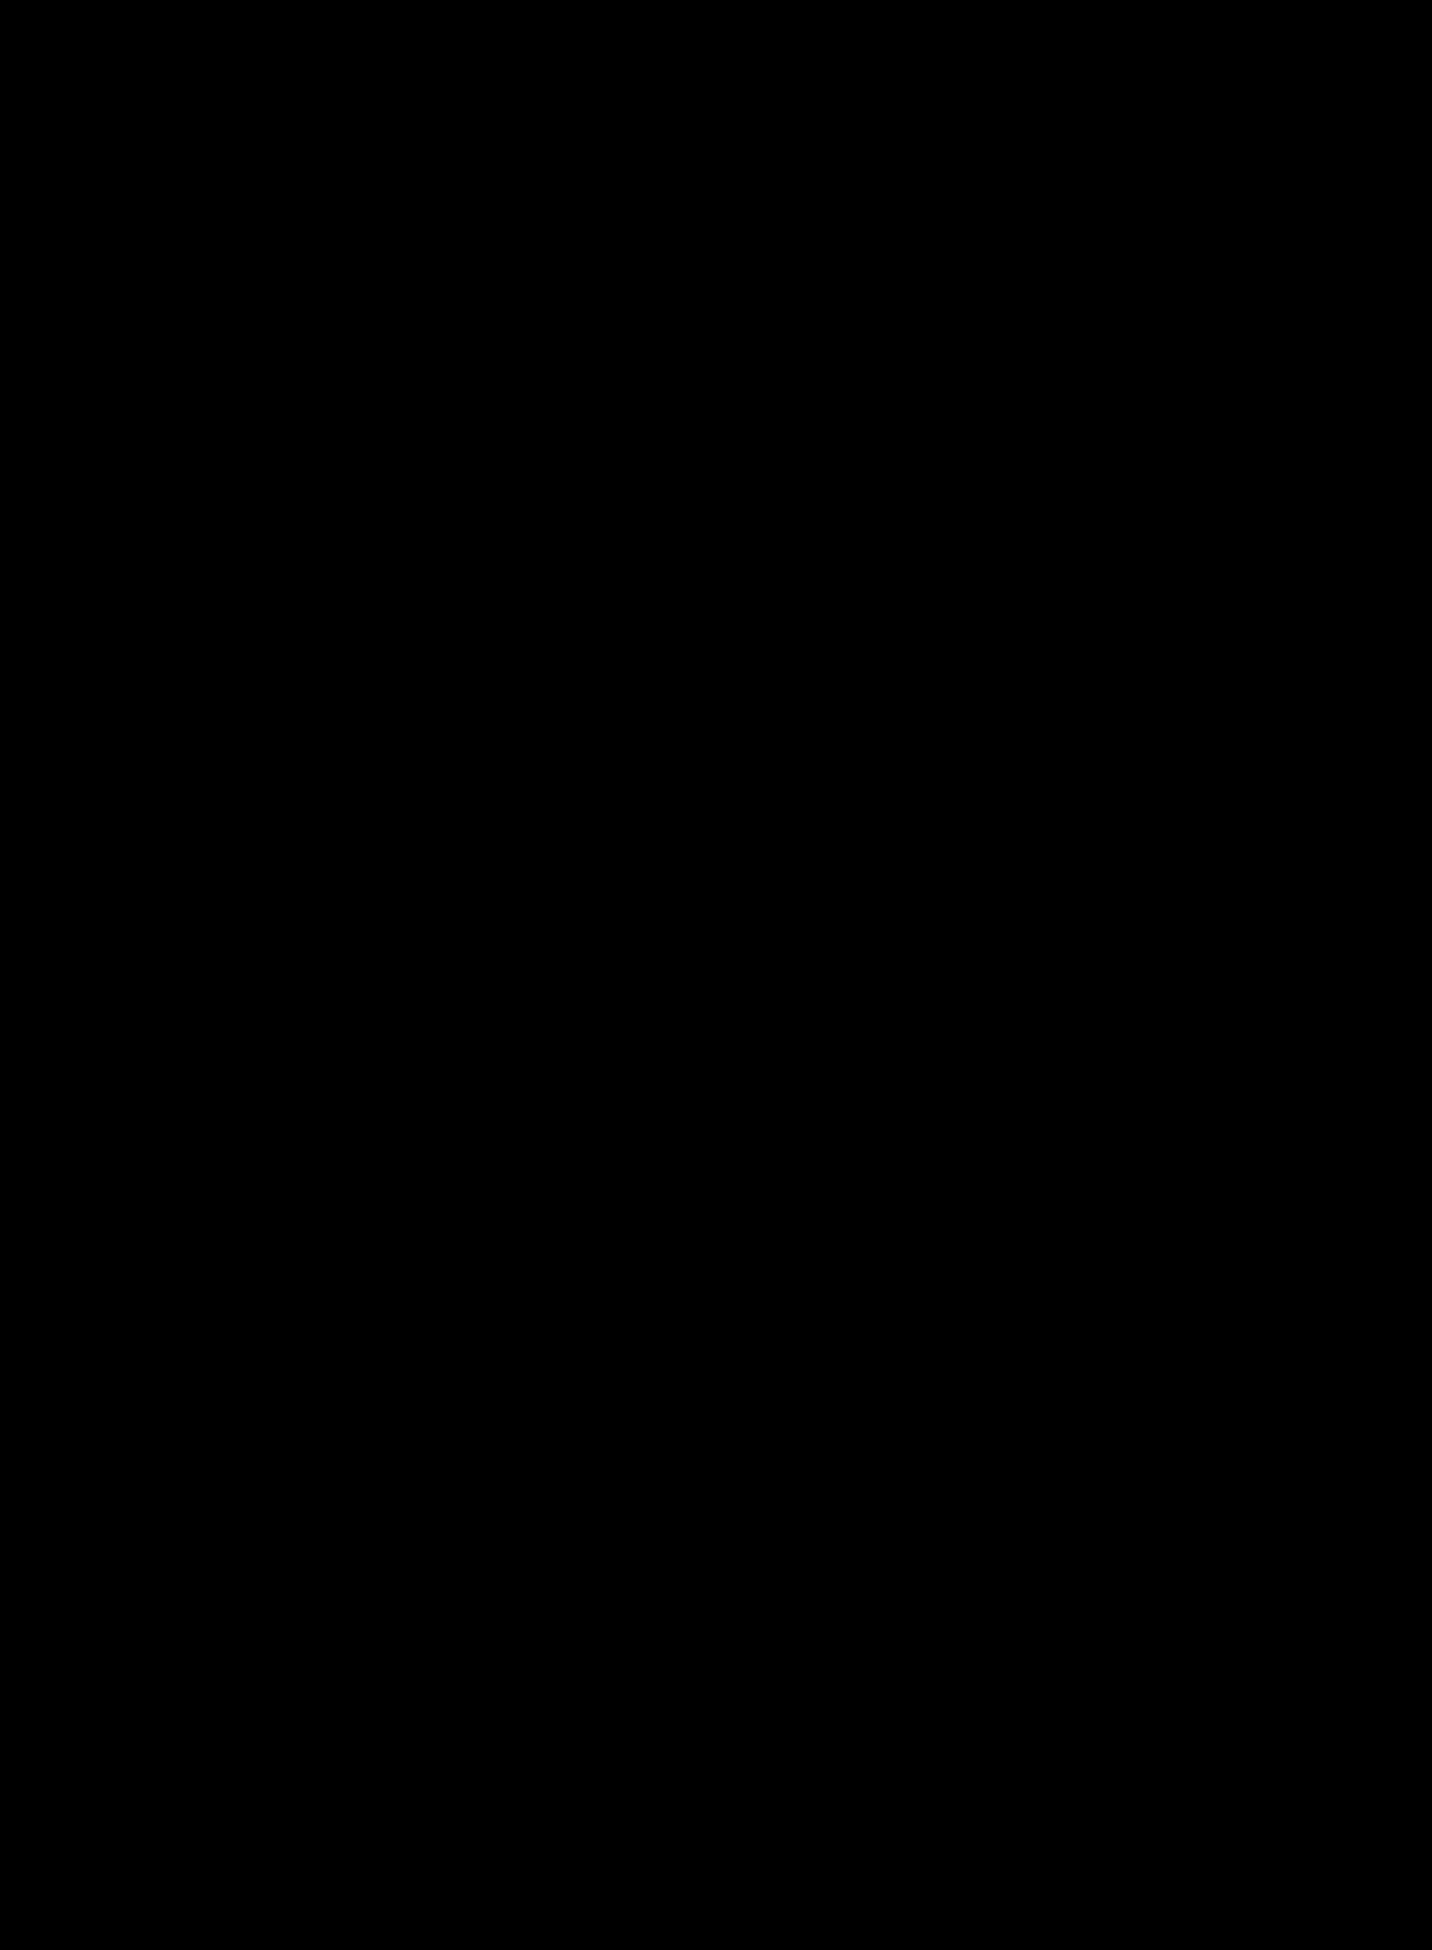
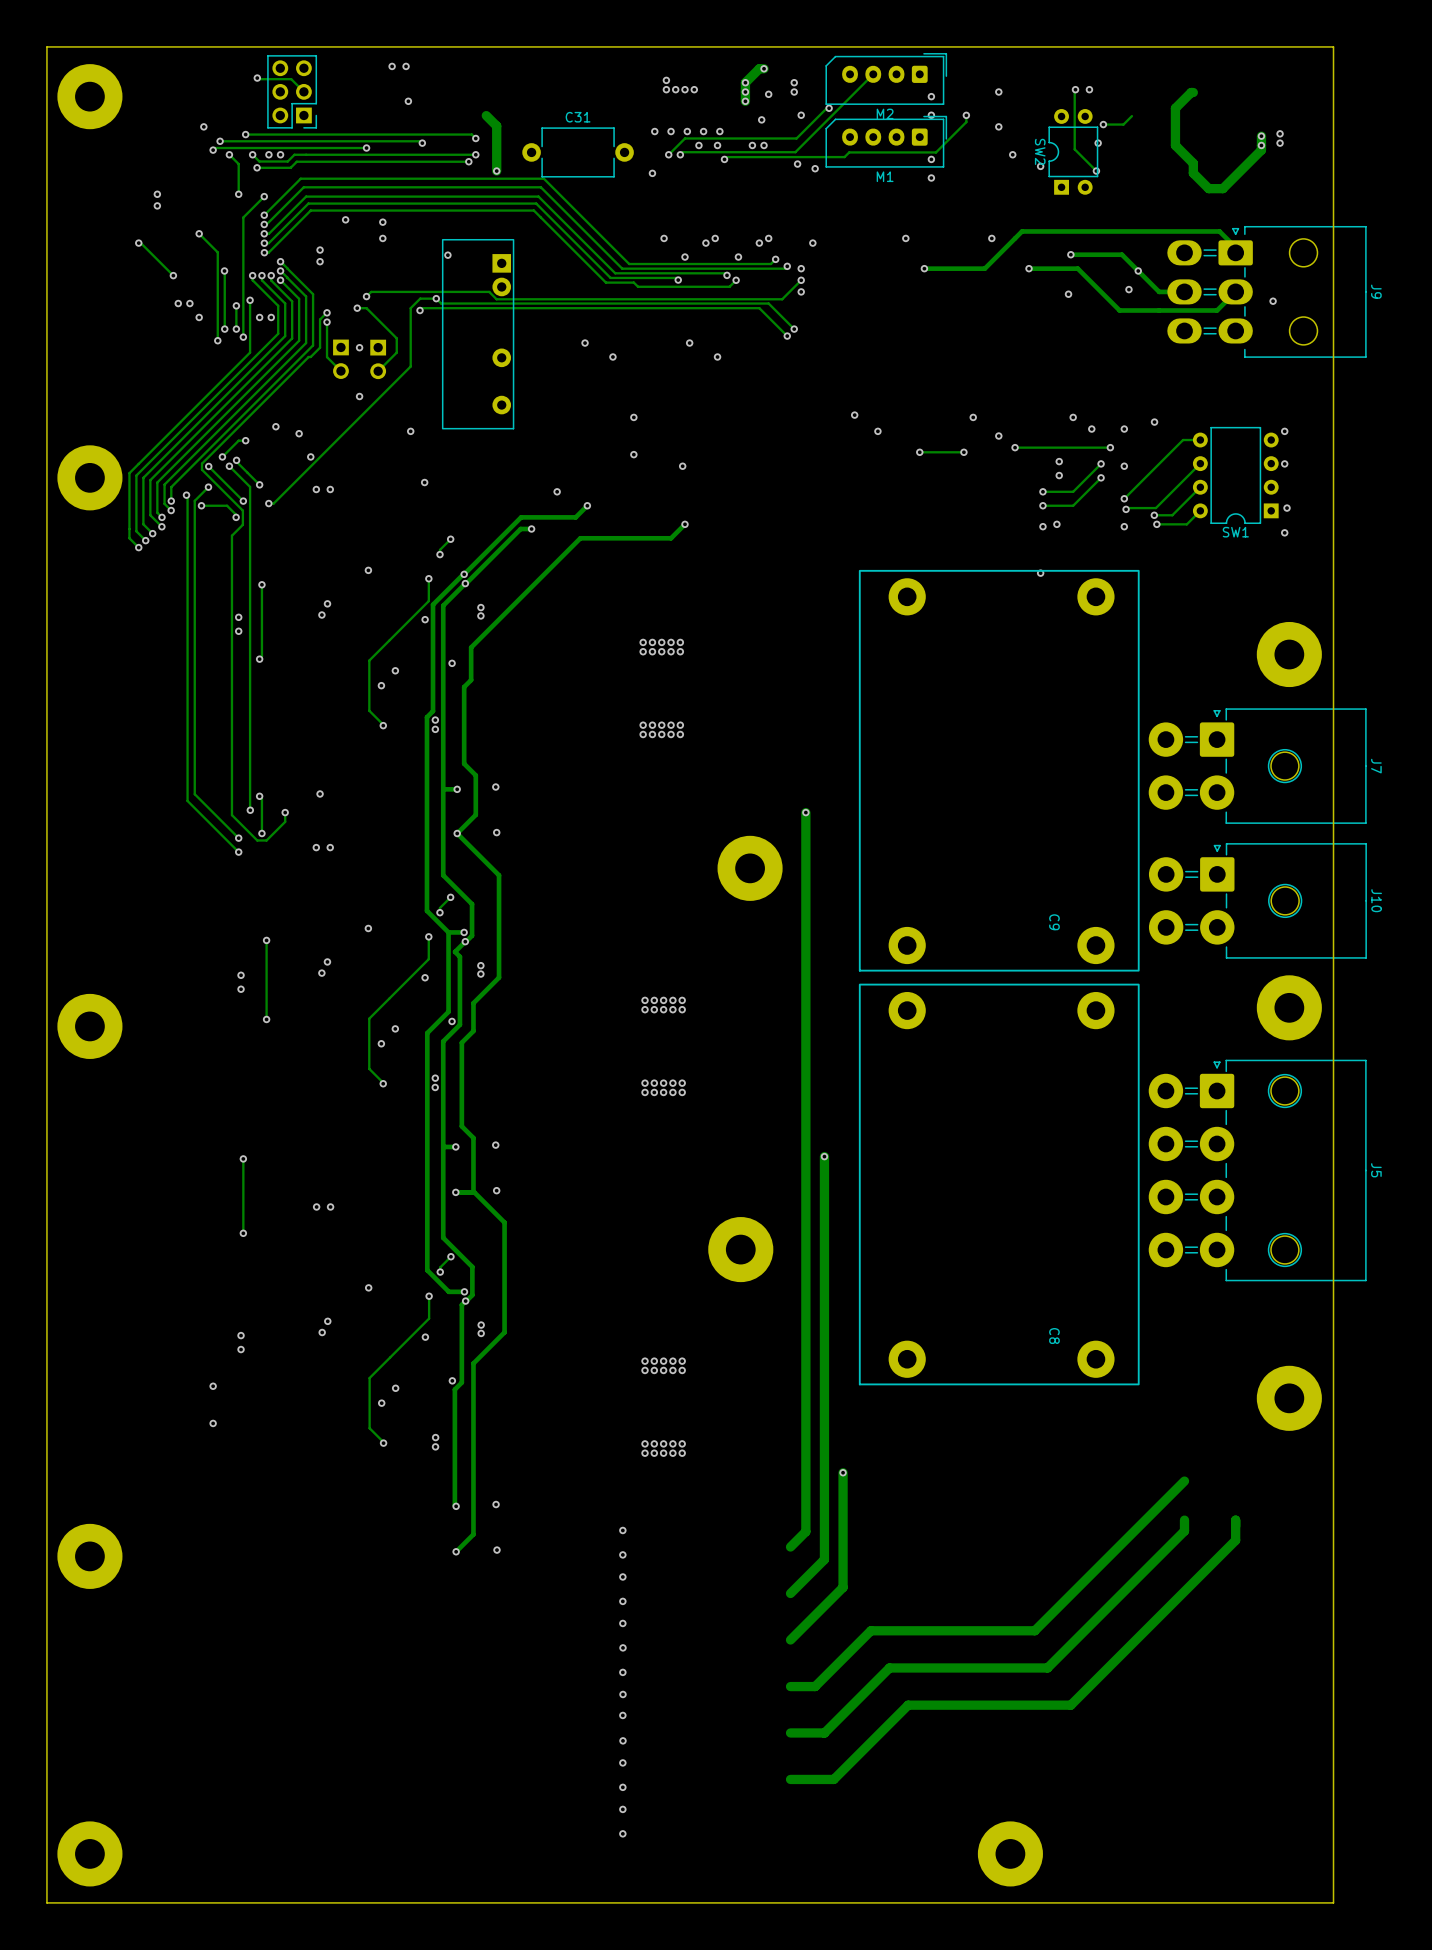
board edge: none -> (1333, 46) (46, 46) (46, 1902) (1333, 1902) (1333, 46)
via: none -> (392, 66)
via: none -> (406, 66)
track: none -> (764, 68) (759, 68) (745, 82) (745, 101)
via: none -> (764, 68)
track: none -> (873, 74) (795, 152) (682, 152) (680, 154)
track: none -> (257, 78) (291, 79) (303, 91)
via: none -> (257, 78)
M2: none -> (886, 78)
via: none -> (666, 80)
via: none -> (745, 82)
via: none -> (794, 82)
via: none -> (666, 89)
via: none -> (675, 89)
via: none -> (684, 89)
via: none -> (694, 89)
track: none -> (1075, 89) (1074, 149) (1096, 171)
via: none -> (1075, 89)
via: none -> (1089, 89)
part: none -> (292, 91)
via: none -> (745, 92)
via: none -> (794, 92)
via: none -> (998, 92)
track: none -> (1193, 92) (1175, 108) (1175, 145) (1193, 163) (1193, 173) (1208, 188) (1222, 188) (1261, 150) (1261, 136)
via: none -> (768, 94)
part: none -> (89, 96)
via: none -> (931, 96)
via: none -> (408, 101)
via: none -> (745, 101)
track: none -> (829, 108) (826, 108) (796, 138) (684, 138) (668, 154)
via: none -> (829, 108)
track: none -> (486, 115) (496, 126) (496, 171)
via: none -> (801, 115)
via: none -> (931, 115)
track: none -> (966, 115) (966, 122) (936, 152) (849, 152) (844, 157) (726, 157) (724, 159)
via: none -> (966, 115)
track: none -> (1131, 116) (1123, 124) (1103, 124)
via: none -> (761, 119)
via: none -> (1103, 124)
via: none -> (203, 126)
via: none -> (998, 126)
via: none -> (654, 131)
via: none -> (671, 131)
via: none -> (687, 131)
via: none -> (703, 131)
via: none -> (719, 131)
via: none -> (1280, 133)
track: none -> (245, 134) (471, 134) (475, 138)
via: none -> (245, 134)
via: none -> (1261, 136)
via: none -> (475, 138)
track: none -> (220, 141) (420, 141) (422, 143)
via: none -> (220, 141)
M1: none -> (886, 141)
via: none -> (422, 143)
via: none -> (1098, 143)
via: none -> (1280, 143)
via: none -> (698, 145)
via: none -> (717, 145)
via: none -> (752, 145)
via: none -> (764, 145)
via: none -> (1261, 145)
track: none -> (366, 148) (215, 148) (213, 150)
via: none -> (366, 148)
via: none -> (213, 150)
SW2: none -> (1073, 151)
C31: none -> (578, 152)
track: none -> (229, 154) (238, 164) (238, 194)
via: none -> (229, 154)
via: none -> (252, 154)
via: none -> (268, 154)
via: none -> (280, 154)
track: none -> (475, 154) (294, 154) (287, 161) (259, 161) (252, 154)
via: none -> (475, 154)
via: none -> (668, 154)
via: none -> (680, 154)
via: none -> (1012, 154)
via: none -> (724, 159)
via: none -> (931, 159)
track: none -> (468, 161) (296, 161) (290, 167) (257, 167)
via: none -> (468, 161)
via: none -> (797, 164)
via: none -> (1040, 166)
via: none -> (257, 167)
via: none -> (815, 168)
via: none -> (496, 171)
via: none -> (1096, 171)
via: none -> (652, 173)
via: none -> (931, 178)
via: none -> (157, 194)
via: none -> (238, 194)
track: none -> (264, 196) (243, 217) (243, 337)
via: none -> (264, 196)
via: none -> (157, 205)
track: none -> (264, 215) (300, 178) (543, 178) (629, 264) (771, 264) (775, 259)
via: none -> (264, 215)
via: none -> (345, 219)
via: none -> (382, 222)
track: none -> (264, 224) (266, 224) (303, 187) (540, 187) (622, 268) (784, 268) (787, 266)
via: none -> (264, 224)
track: none -> (199, 233) (217, 252) (217, 340)
via: none -> (199, 233)
track: none -> (264, 233) (268, 233) (306, 196) (538, 196) (615, 273) (724, 273) (727, 275)
via: none -> (264, 233)
via: none -> (382, 238)
via: none -> (664, 238)
via: none -> (715, 238)
via: none -> (768, 238)
via: none -> (905, 238)
via: none -> (991, 238)
track: none -> (138, 243) (173, 275)
via: none -> (138, 243)
track: none -> (264, 243) (268, 243) (308, 203) (536, 203) (610, 277) (676, 277) (678, 280)
via: none -> (264, 243)
via: none -> (705, 243)
via: none -> (759, 243)
via: none -> (812, 243)
via: none -> (320, 250)
track: none -> (264, 252) (268, 252) (310, 210) (533, 210) (605, 282) (633, 282) (638, 286) (729, 286) (736, 280)
via: none -> (264, 252)
track: none -> (1235, 252) (1235, 247) (1219, 231) (1022, 231) (984, 268) (924, 268)
track: none -> (1070, 254) (1121, 254) (1159, 291) (1184, 291)
via: none -> (1070, 254)
via: none -> (447, 255)
via: none -> (684, 257)
via: none -> (738, 257)
via: none -> (775, 259)
track: none -> (280, 261) (313, 294) (313, 345) (171, 487) (171, 501)
via: none -> (280, 261)
via: none -> (320, 261)
via: none -> (787, 266)
via: none -> (801, 268)
via: none -> (924, 268)
track: none -> (1029, 268) (1077, 268) (1119, 310) (1217, 310) (1235, 291)
via: none -> (1029, 268)
track: none -> (224, 270) (224, 329)
via: none -> (224, 270)
track: none -> (280, 270) (306, 296) (306, 343) (164, 484) (164, 503) (171, 510)
via: none -> (280, 270)
via: none -> (1138, 270)
via: none -> (173, 275)
track: none -> (252, 275) (252, 280) (278, 305) (278, 333) (136, 475) (136, 531) (145, 540)
via: none -> (252, 275)
track: none -> (261, 275) (261, 280) (285, 303) (285, 336) (143, 477) (143, 524) (152, 533)
via: none -> (261, 275)
track: none -> (271, 275) (271, 280) (292, 301) (292, 338) (150, 480) (150, 515) (161, 526)
via: none -> (271, 275)
via: none -> (727, 275)
track: none -> (280, 280) (299, 298) (299, 340) (157, 482) (157, 512) (161, 517)
via: none -> (280, 280)
via: none -> (678, 280)
via: none -> (736, 280)
track: none -> (801, 280) (782, 299) (496, 299) (489, 291) (371, 291) (366, 296)
via: none -> (801, 280)
via: none -> (1128, 289)
via: none -> (801, 291)
J9: none -> (1266, 291)
via: none -> (1068, 294)
via: none -> (366, 296)
via: none -> (436, 298)
track: none -> (250, 300) (250, 352) (129, 473) (129, 538) (138, 547)
via: none -> (250, 300)
via: none -> (1273, 301)
via: none -> (178, 303)
via: none -> (189, 303)
track: none -> (236, 305) (236, 329)
via: none -> (236, 305)
track: none -> (357, 308) (366, 308) (396, 338) (396, 352) (378, 371)
via: none -> (357, 308)
track: none -> (420, 310) (422, 308) (759, 308) (787, 336)
via: none -> (420, 310)
track: none -> (327, 312) (320, 319) (320, 347) (201, 463) (201, 469) (242, 510) (242, 524) (231, 535) (231, 815) (257, 840) (266, 840) (285, 821) (285, 812)
via: none -> (327, 312)
via: none -> (199, 317)
via: none -> (259, 317)
via: none -> (271, 317)
track: none -> (327, 322) (327, 357) (340, 371)
via: none -> (327, 322)
via: none -> (224, 329)
via: none -> (236, 329)
track: none -> (794, 329) (768, 303) (441, 303) (436, 298) (420, 298) (410, 308) (410, 366) (273, 503) (268, 503)
via: none -> (794, 329)
part: none -> (478, 334)
via: none -> (787, 336)
via: none -> (243, 337)
via: none -> (217, 340)
via: none -> (585, 343)
via: none -> (689, 343)
via: none -> (359, 347)
via: none -> (612, 356)
via: none -> (717, 356)
part: none -> (340, 359)
part: none -> (378, 359)
via: none -> (359, 396)
via: none -> (854, 415)
via: none -> (633, 417)
via: none -> (973, 417)
via: none -> (1073, 417)
via: none -> (1154, 422)
via: none -> (275, 426)
via: none -> (1091, 429)
via: none -> (1124, 429)
via: none -> (410, 431)
via: none -> (877, 431)
via: none -> (1284, 431)
via: none -> (299, 433)
via: none -> (998, 436)
track: none -> (245, 440) (238, 440) (222, 456)
via: none -> (245, 440)
track: none -> (1200, 440) (1183, 440) (1124, 498)
via: none -> (1015, 447)
track: none -> (1110, 447) (1015, 447)
via: none -> (1110, 447)
via: none -> (919, 452)
track: none -> (963, 452) (919, 452)
via: none -> (963, 452)
via: none -> (633, 454)
via: none -> (222, 456)
via: none -> (310, 456)
track: none -> (236, 460) (259, 484)
via: none -> (236, 460)
via: none -> (1059, 461)
track: none -> (1101, 463) (1073, 491) (1042, 491)
via: none -> (1101, 463)
track: none -> (1200, 463) (1155, 508) (1126, 509)
via: none -> (1284, 463)
track: none -> (208, 466) (243, 501)
via: none -> (208, 466)
track: none -> (229, 466) (250, 486) (250, 810)
via: none -> (229, 466)
via: none -> (682, 466)
via: none -> (1124, 466)
via: none -> (1059, 475)
SW1: none -> (1235, 475)
part: none -> (89, 477)
track: none -> (1101, 477) (1073, 505) (1042, 505)
via: none -> (1101, 477)
via: none -> (424, 482)
via: none -> (259, 484)
track: none -> (208, 487) (194, 500) (194, 794) (238, 838)
via: none -> (208, 487)
track: none -> (1200, 487) (1172, 515) (1154, 515)
via: none -> (316, 489)
via: none -> (330, 489)
via: none -> (557, 491)
via: none -> (1042, 491)
track: none -> (186, 495) (187, 800) (238, 852)
via: none -> (186, 495)
via: none -> (1124, 498)
via: none -> (171, 501)
via: none -> (243, 501)
via: none -> (268, 503)
track: none -> (201, 505) (227, 505) (236, 514) (236, 517)
via: none -> (201, 505)
track: none -> (587, 505) (575, 517) (521, 517) (433, 604) (433, 711) (426, 717) (426, 910) (448, 932)
via: none -> (587, 505)
via: none -> (1042, 505)
via: none -> (1287, 508)
via: none -> (1126, 509)
via: none -> (171, 510)
track: none -> (1200, 510) (1186, 524) (1156, 524)
via: none -> (1154, 515)
via: none -> (161, 517)
via: none -> (236, 517)
track: none -> (684, 524) (671, 538) (580, 538) (471, 647) (471, 680) (464, 687) (464, 763) (475, 775) (475, 814) (457, 833) (499, 875) (499, 977) (473, 1003) (473, 1031) (461, 1042) (461, 1126) (473, 1138) (473, 1192)
via: none -> (684, 524)
via: none -> (1056, 524)
via: none -> (1156, 524)
via: none -> (161, 526)
via: none -> (1042, 526)
via: none -> (1124, 526)
track: none -> (531, 529) (520, 529) (443, 605) (443, 875) (472, 904) (472, 935) (455, 951) (459, 956) (459, 1024) (443, 1041) (443, 1237) (472, 1266) (472, 1295) (461, 1304) (461, 1382) (454, 1389) (456, 1506)
via: none -> (531, 529)
via: none -> (1284, 532)
via: none -> (152, 533)
track: none -> (450, 539) (440, 549) (440, 554)
via: none -> (450, 539)
via: none -> (145, 540)
via: none -> (138, 547)
via: none -> (440, 554)
via: none -> (368, 570)
via: none -> (1040, 573)
via: none -> (464, 574)
track: none -> (428, 578) (428, 601) (369, 660) (369, 710) (383, 725)
via: none -> (428, 578)
via: none -> (465, 583)
track: none -> (261, 584) (261, 656) (259, 659)
via: none -> (261, 584)
via: none -> (327, 603)
via: none -> (480, 607)
via: none -> (321, 615)
via: none -> (480, 615)
via: none -> (238, 617)
via: none -> (425, 619)
via: none -> (238, 631)
via: none -> (643, 642)
via: none -> (652, 642)
via: none -> (661, 642)
via: none -> (671, 642)
via: none -> (680, 642)
via: none -> (643, 651)
via: none -> (652, 651)
via: none -> (661, 651)
via: none -> (671, 651)
via: none -> (680, 651)
part: none -> (1289, 654)
via: none -> (259, 659)
via: none -> (452, 663)
via: none -> (395, 670)
via: none -> (381, 685)
via: none -> (435, 720)
via: none -> (383, 725)
via: none -> (643, 725)
via: none -> (652, 725)
via: none -> (661, 725)
via: none -> (671, 725)
via: none -> (680, 725)
via: none -> (435, 729)
via: none -> (643, 734)
via: none -> (652, 734)
via: none -> (661, 734)
via: none -> (671, 734)
via: none -> (680, 734)
J7: none -> (1257, 766)
C9: none -> (999, 770)
via: none -> (495, 787)
track: none -> (457, 789) (443, 789)
via: none -> (457, 789)
via: none -> (320, 793)
track: none -> (259, 796) (261, 798) (261, 833)
via: none -> (259, 796)
via: none -> (250, 810)
via: none -> (285, 812)
track: none -> (805, 812) (805, 1531) (790, 1547)
via: none -> (805, 812)
via: none -> (496, 832)
via: none -> (261, 833)
via: none -> (457, 833)
via: none -> (238, 838)
via: none -> (316, 847)
via: none -> (330, 847)
via: none -> (238, 852)
part: none -> (750, 868)
track: none -> (450, 897) (439, 908) (439, 912)
via: none -> (450, 897)
J10: none -> (1257, 900)
via: none -> (439, 912)
via: none -> (368, 928)
track: none -> (448, 932) (448, 1011) (427, 1033) (427, 1270) (448, 1291) (464, 1291)
track: none -> (464, 932) (448, 932)
via: none -> (464, 932)
track: none -> (428, 936) (428, 959) (369, 1018) (369, 1068) (383, 1083)
via: none -> (428, 936)
track: none -> (266, 940) (266, 1019)
via: none -> (266, 940)
via: none -> (465, 941)
via: none -> (327, 961)
via: none -> (480, 965)
via: none -> (321, 973)
via: none -> (480, 974)
via: none -> (241, 975)
via: none -> (425, 977)
via: none -> (241, 989)
via: none -> (645, 1000)
via: none -> (654, 1000)
via: none -> (663, 1000)
via: none -> (672, 1000)
via: none -> (682, 1000)
part: none -> (1289, 1007)
via: none -> (645, 1009)
via: none -> (654, 1009)
via: none -> (663, 1009)
via: none -> (672, 1009)
via: none -> (682, 1009)
via: none -> (266, 1019)
via: none -> (452, 1021)
part: none -> (89, 1026)
via: none -> (395, 1028)
via: none -> (381, 1043)
via: none -> (435, 1078)
via: none -> (383, 1083)
via: none -> (645, 1083)
via: none -> (654, 1083)
via: none -> (663, 1083)
via: none -> (672, 1083)
via: none -> (682, 1083)
via: none -> (435, 1087)
via: none -> (645, 1092)
via: none -> (654, 1092)
via: none -> (663, 1092)
via: none -> (672, 1092)
via: none -> (682, 1092)
via: none -> (495, 1145)
track: none -> (455, 1146) (443, 1146)
via: none -> (455, 1146)
track: none -> (824, 1156) (824, 1559) (790, 1593)
via: none -> (824, 1156)
track: none -> (243, 1158) (243, 1233)
via: none -> (243, 1158)
J5: none -> (1257, 1170)
C8: none -> (999, 1184)
via: none -> (496, 1190)
track: none -> (455, 1192) (474, 1192) (504, 1222) (504, 1332) (473, 1363) (473, 1534) (456, 1551)
via: none -> (455, 1192)
via: none -> (316, 1206)
via: none -> (330, 1206)
via: none -> (243, 1233)
part: none -> (740, 1249)
track: none -> (450, 1256) (440, 1267) (440, 1272)
via: none -> (450, 1256)
via: none -> (440, 1272)
via: none -> (368, 1287)
via: none -> (464, 1291)
track: none -> (429, 1296) (429, 1318) (369, 1378) (369, 1428) (383, 1443)
via: none -> (429, 1296)
via: none -> (465, 1301)
via: none -> (327, 1321)
via: none -> (481, 1325)
via: none -> (322, 1332)
via: none -> (481, 1333)
via: none -> (241, 1335)
via: none -> (425, 1337)
via: none -> (241, 1349)
via: none -> (645, 1361)
via: none -> (654, 1361)
via: none -> (663, 1361)
via: none -> (672, 1361)
via: none -> (682, 1361)
via: none -> (645, 1370)
via: none -> (654, 1370)
via: none -> (663, 1370)
via: none -> (672, 1370)
via: none -> (682, 1370)
via: none -> (452, 1380)
via: none -> (213, 1386)
via: none -> (395, 1388)
part: none -> (1289, 1398)
via: none -> (381, 1403)
via: none -> (213, 1423)
via: none -> (435, 1437)
via: none -> (383, 1443)
via: none -> (645, 1443)
via: none -> (654, 1443)
via: none -> (663, 1443)
via: none -> (672, 1443)
via: none -> (682, 1443)
via: none -> (435, 1446)
via: none -> (645, 1453)
via: none -> (654, 1453)
via: none -> (663, 1453)
via: none -> (672, 1453)
via: none -> (682, 1453)
track: none -> (843, 1472) (843, 1587) (790, 1639)
via: none -> (843, 1472)
track: none -> (1184, 1481) (1034, 1630) (870, 1630) (815, 1686) (790, 1686)
via: none -> (496, 1504)
via: none -> (456, 1506)
track: none -> (1184, 1520) (1184, 1531) (1047, 1667) (889, 1667) (824, 1733)
track: none -> (1235, 1520) (1235, 1540) (1070, 1705) (908, 1705) (833, 1779) (790, 1779)
via: none -> (622, 1530)
via: none -> (496, 1550)
via: none -> (456, 1551)
via: none -> (622, 1554)
part: none -> (89, 1556)
via: none -> (622, 1576)
via: none -> (622, 1601)
via: none -> (622, 1623)
via: none -> (622, 1647)
via: none -> (622, 1672)
via: none -> (622, 1694)
via: none -> (622, 1715)
track: none -> (824, 1732) (790, 1732)
via: none -> (622, 1740)
via: none -> (622, 1762)
via: none -> (622, 1787)
via: none -> (622, 1809)
via: none -> (622, 1833)
part: none -> (89, 1853)
part: none -> (1010, 1853)

